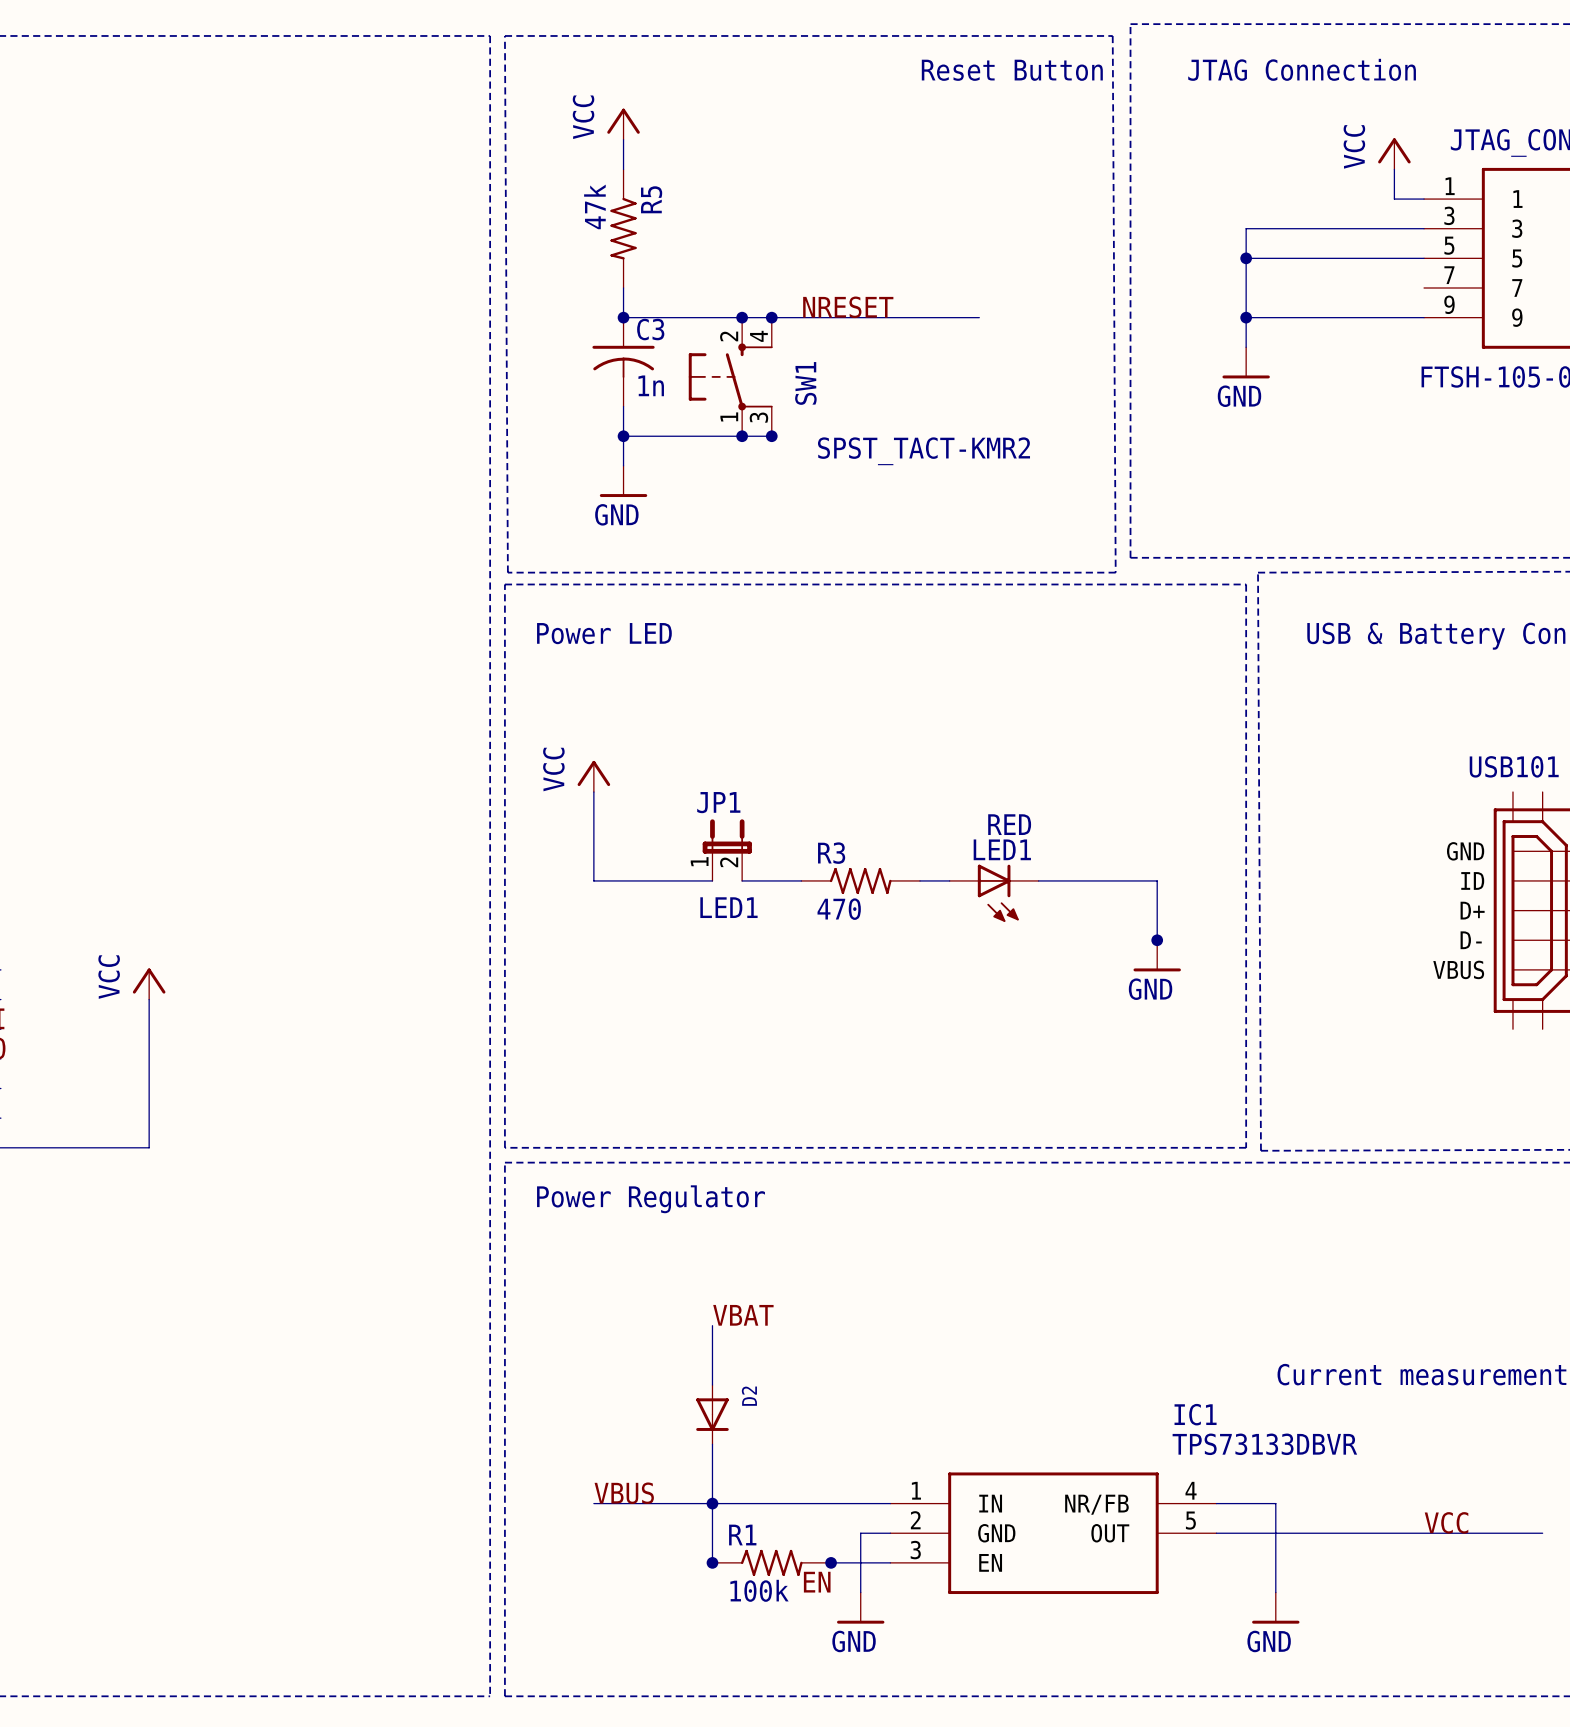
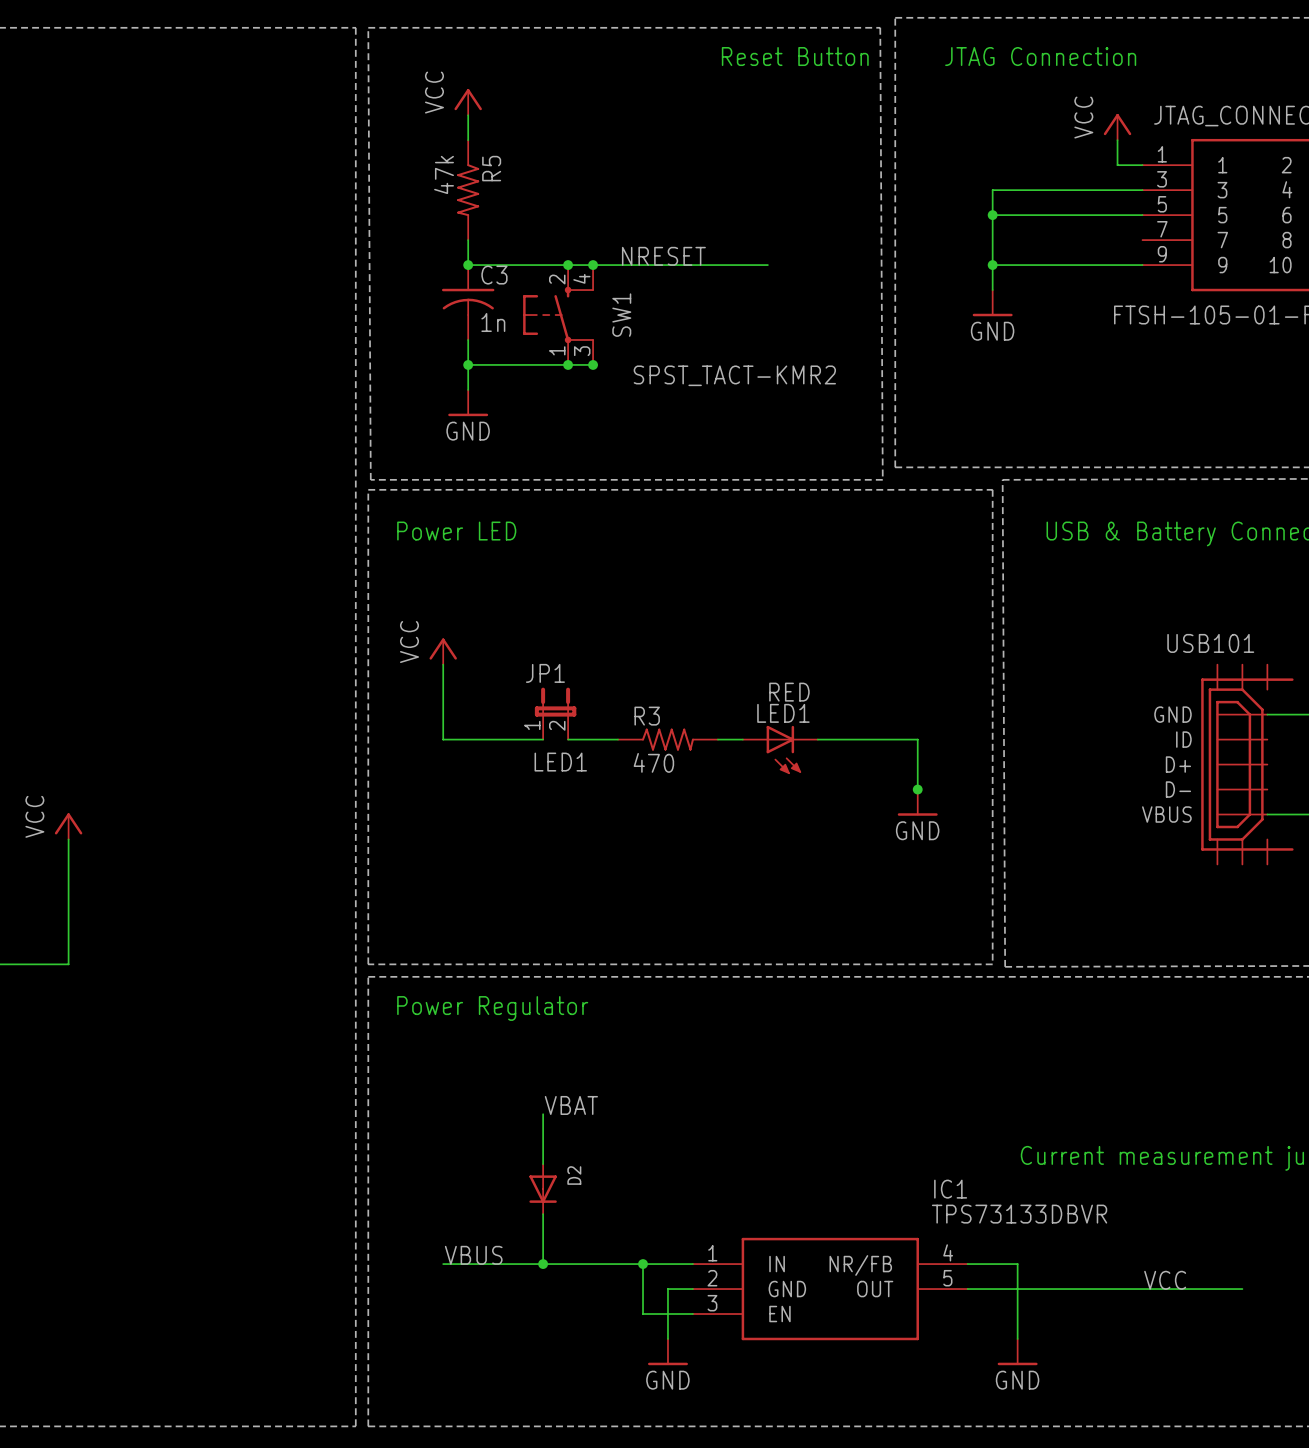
wire: (712, 1503) (712, 1562) -> (643, 1264) (643, 1314)
junction: (712, 1562) -> none
R1: 100k (771, 1562) -> none
junction position: (831, 1562) -> (643, 1264)
label: EN (817, 1582) -> none

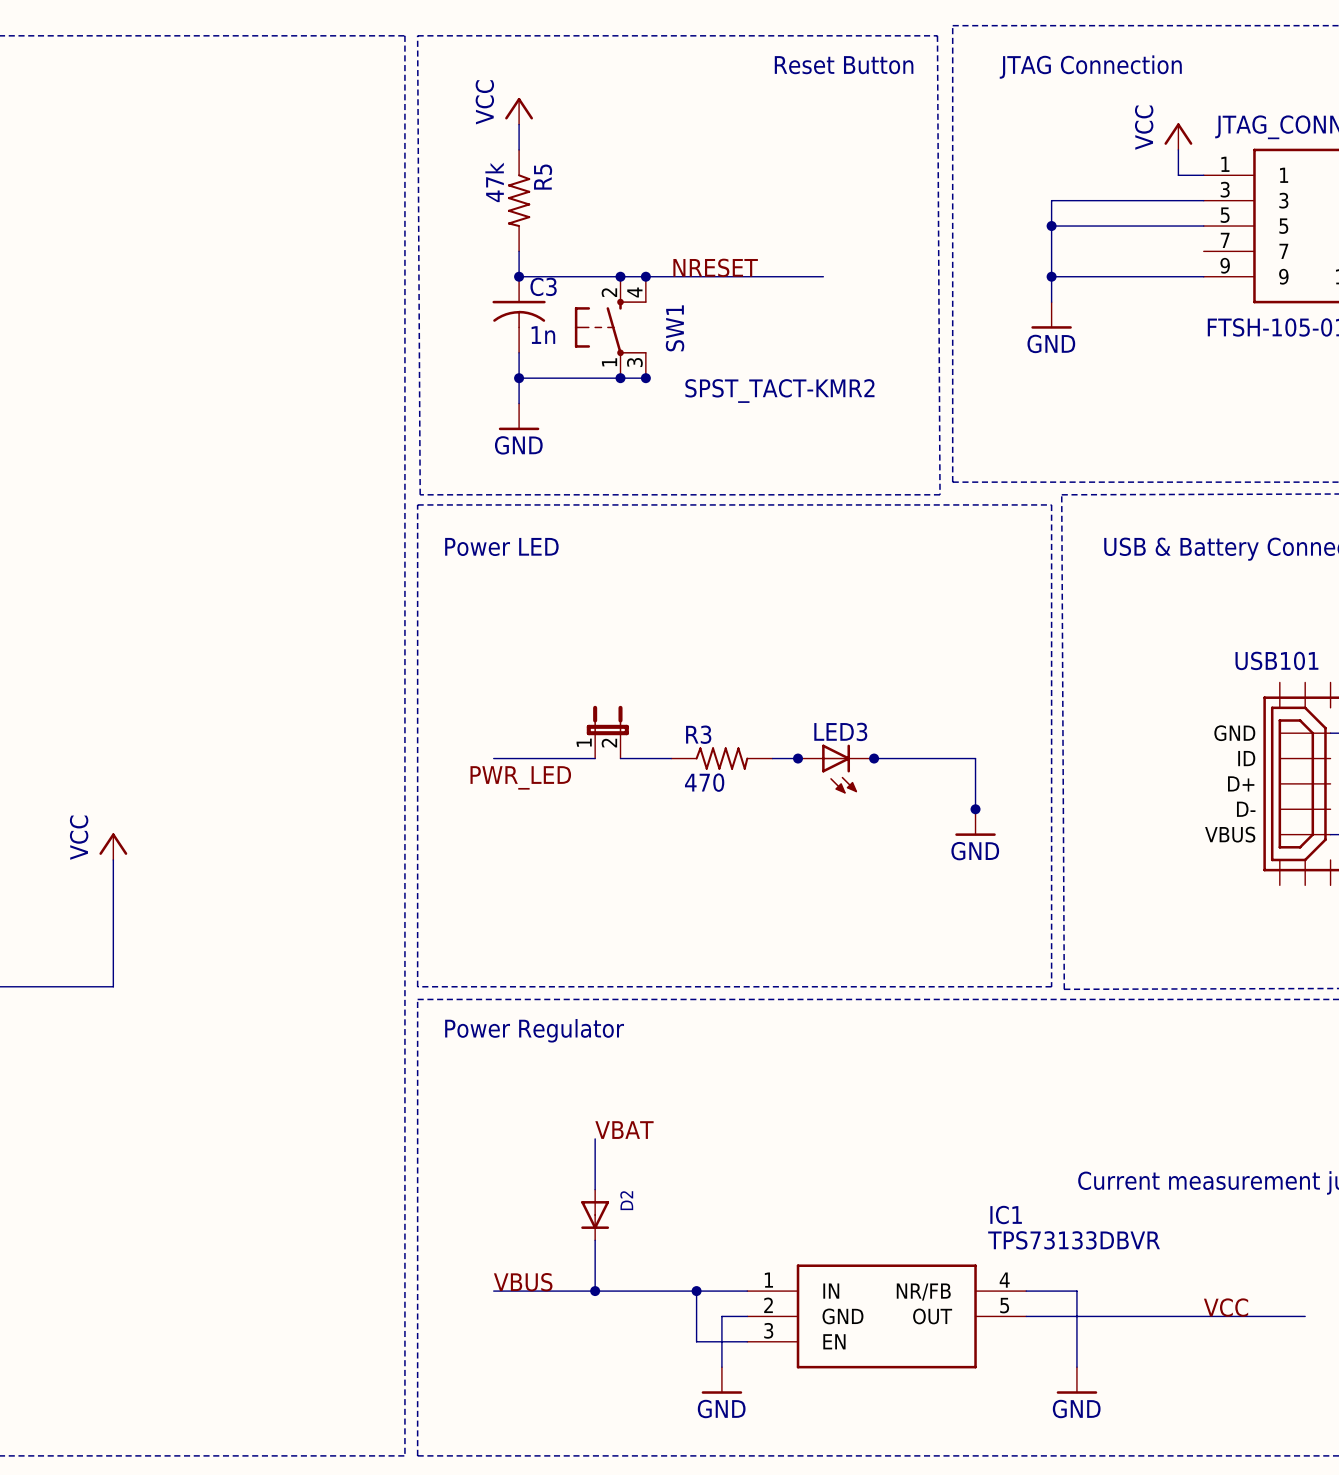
power symbol: VCC (443, 651) -> none
wire: (443, 664) (443, 739) -> none
JP1 name: JP1 (545, 673) -> none
LED1 value: RED (789, 692) -> none
LED1 name: LED1 (783, 713) -> LED3 (840, 731)
junction: none -> (798, 758)
junction: none -> (874, 758)
label: none -> PWR_LED (520, 777)
JP1 value: LED1 (560, 762) -> none

